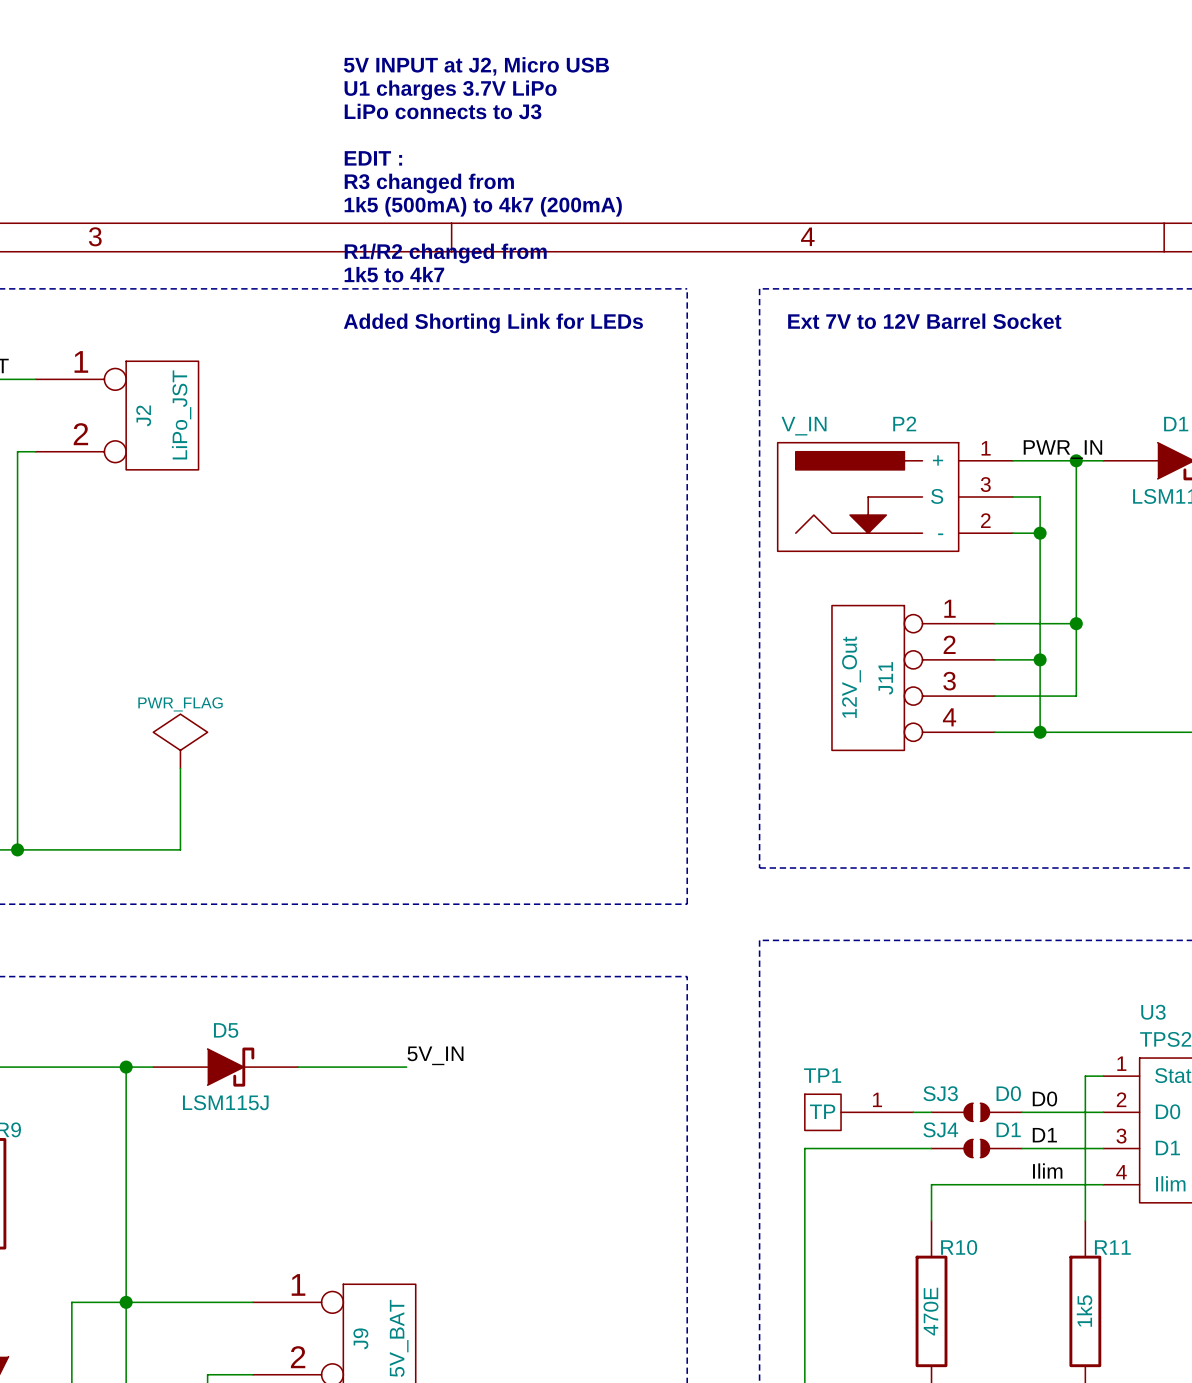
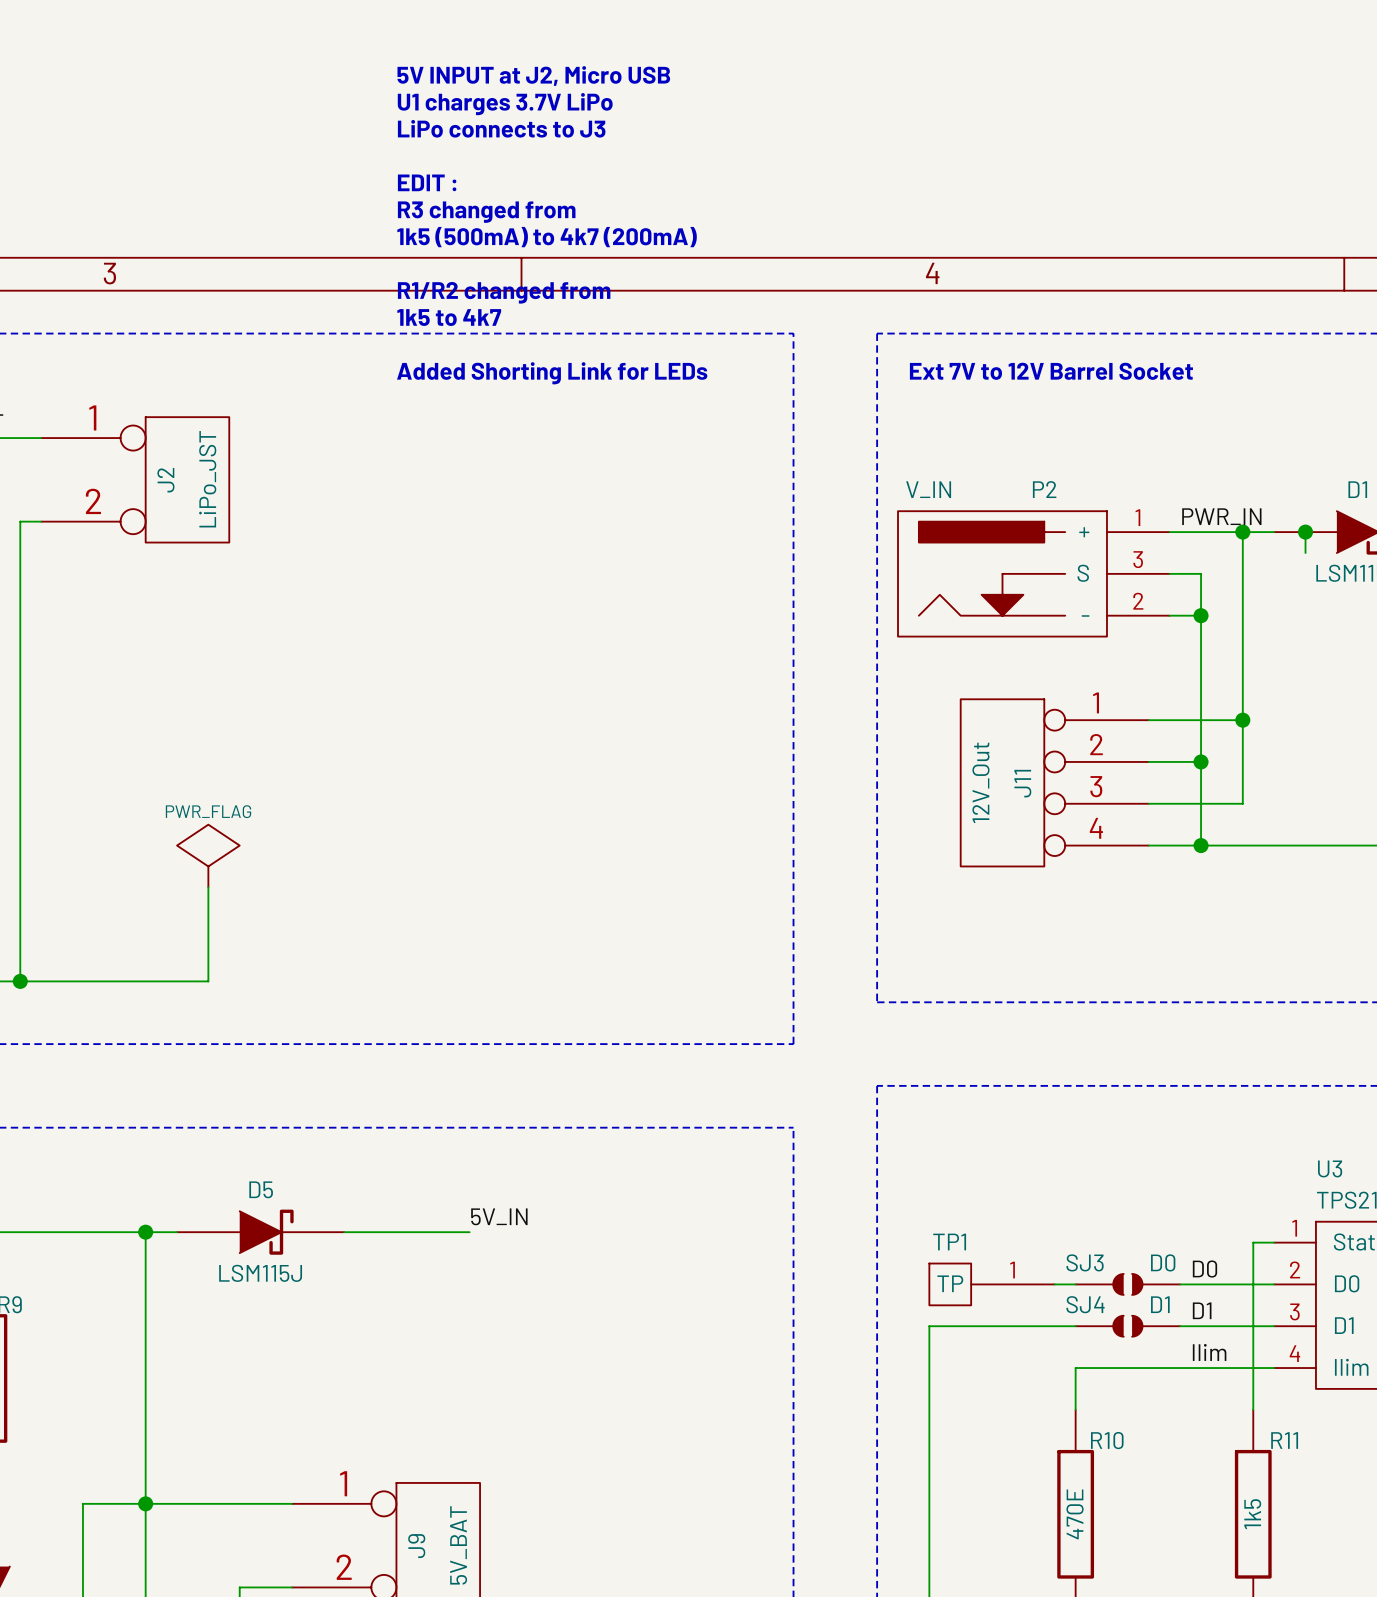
wire: none -> (1305, 532) (1305, 552)
junction: none -> (1305, 532)

